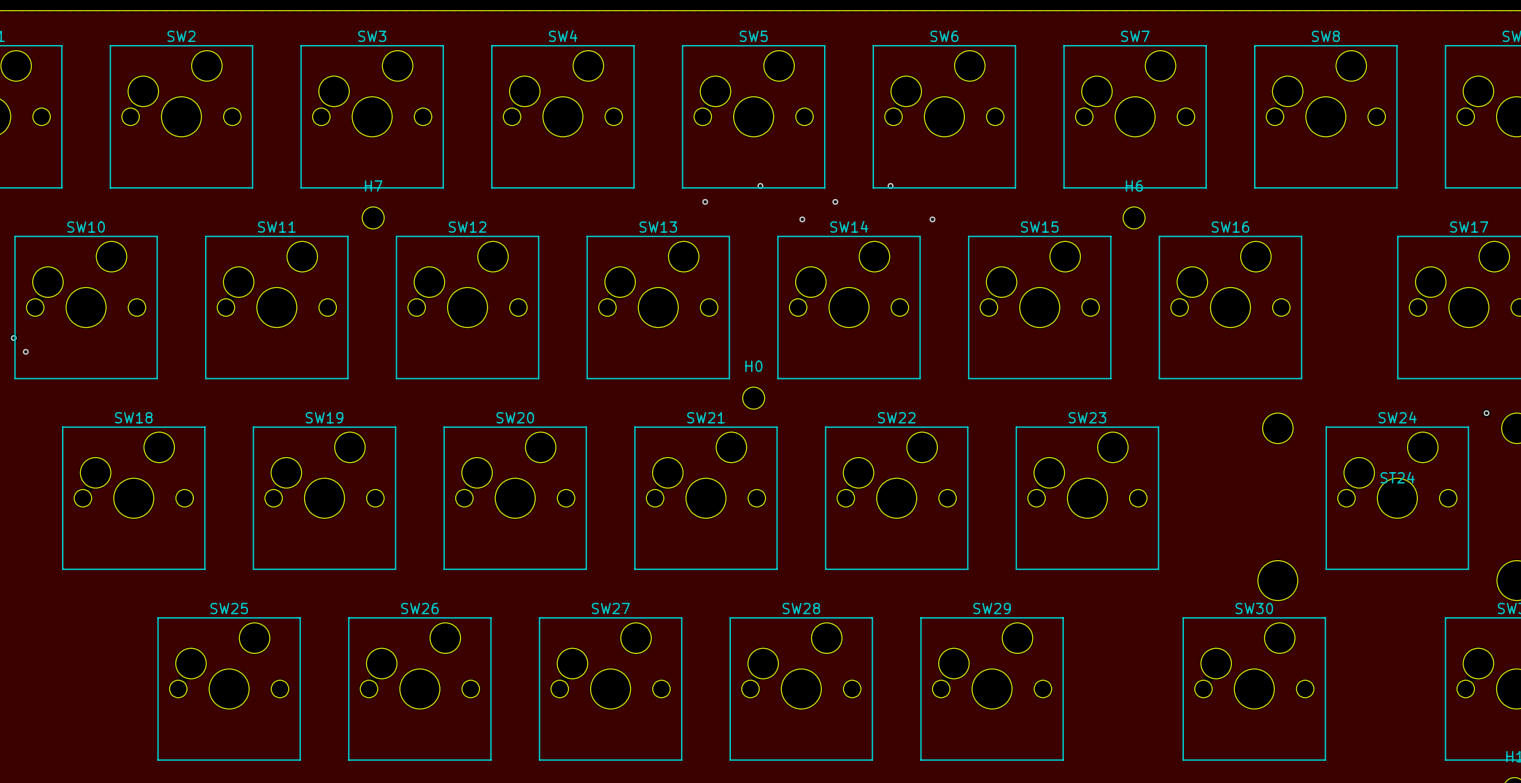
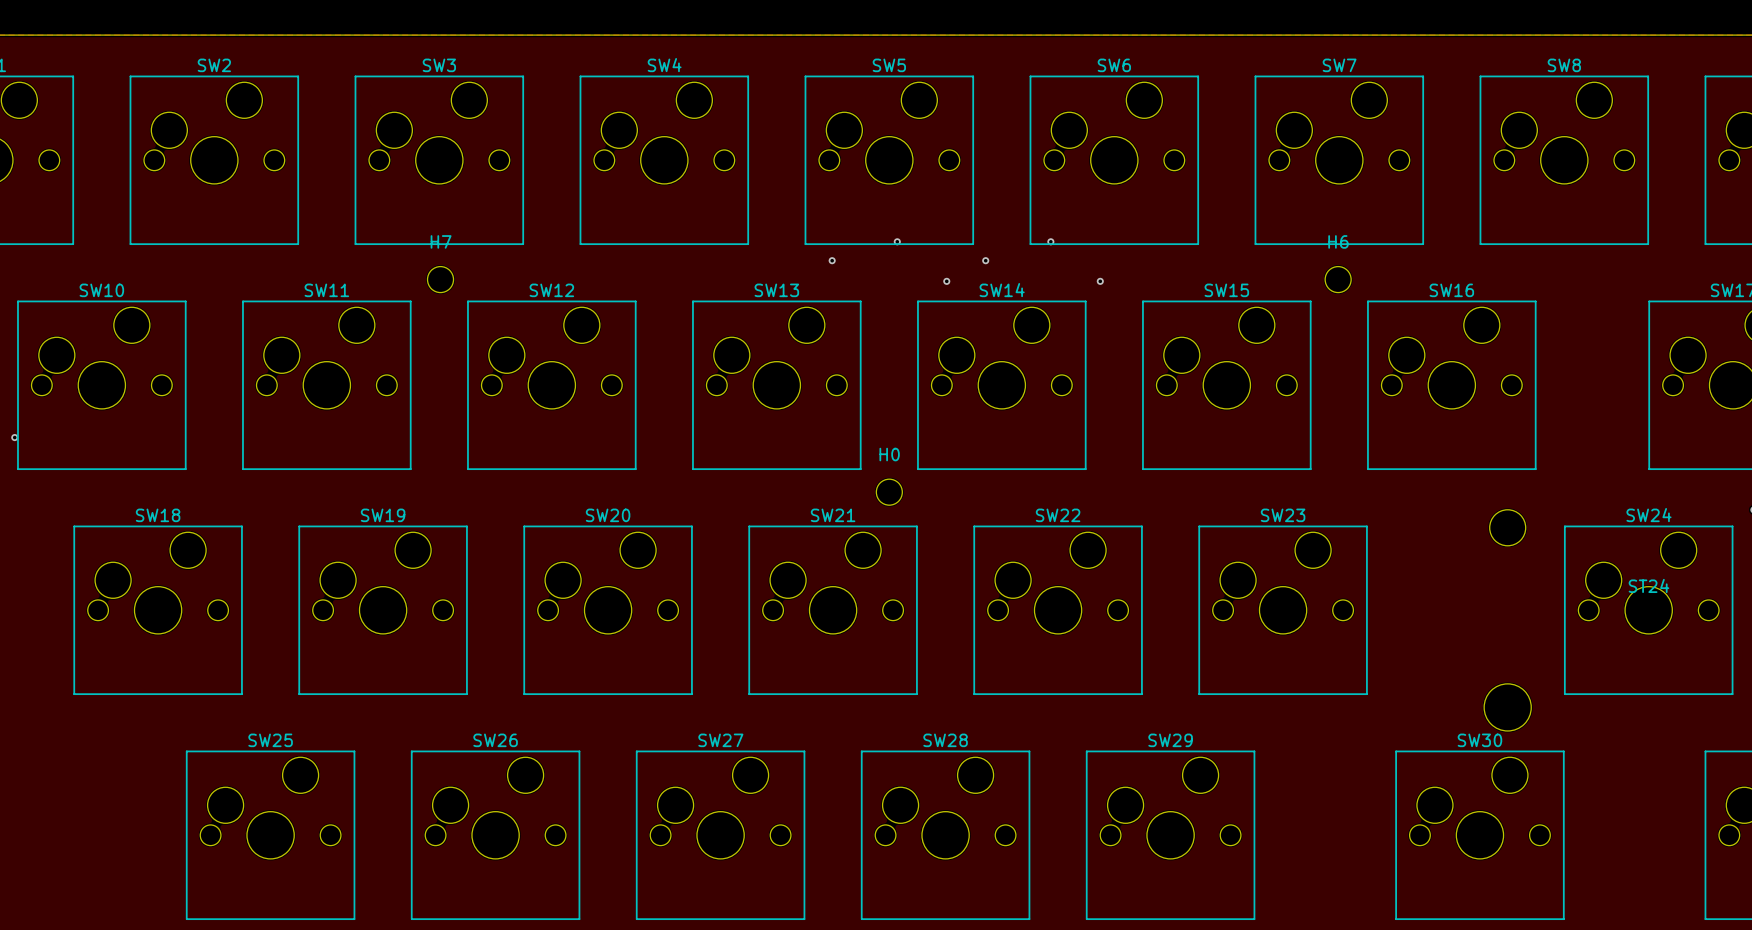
via: (13, 338) -> none
via: none -> (14, 437)
via: (25, 351) -> none

